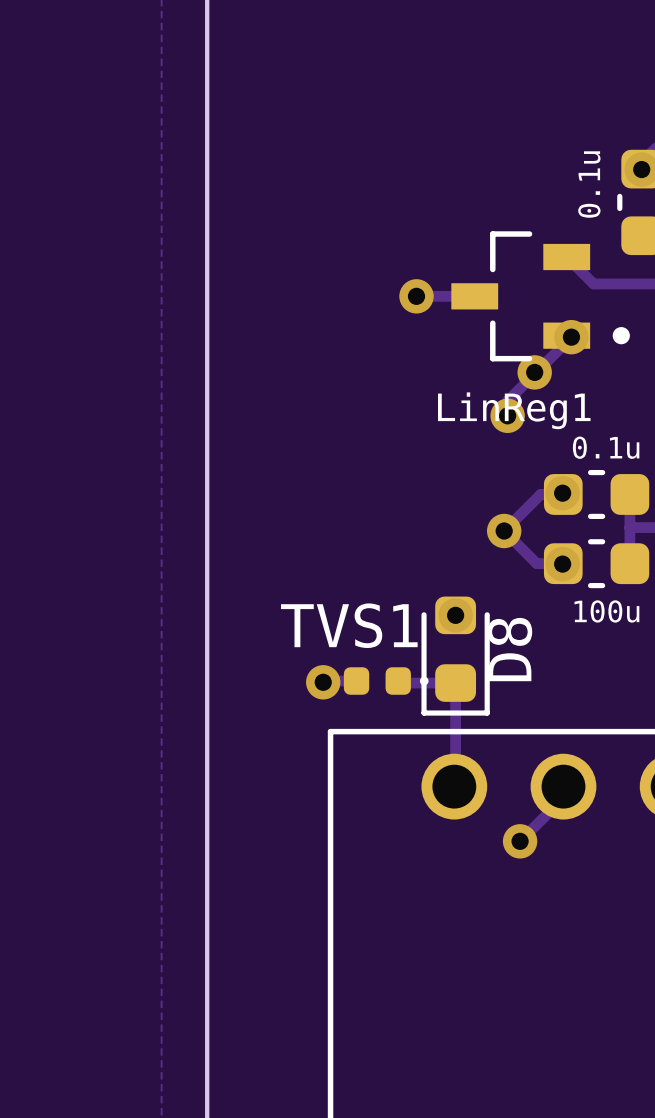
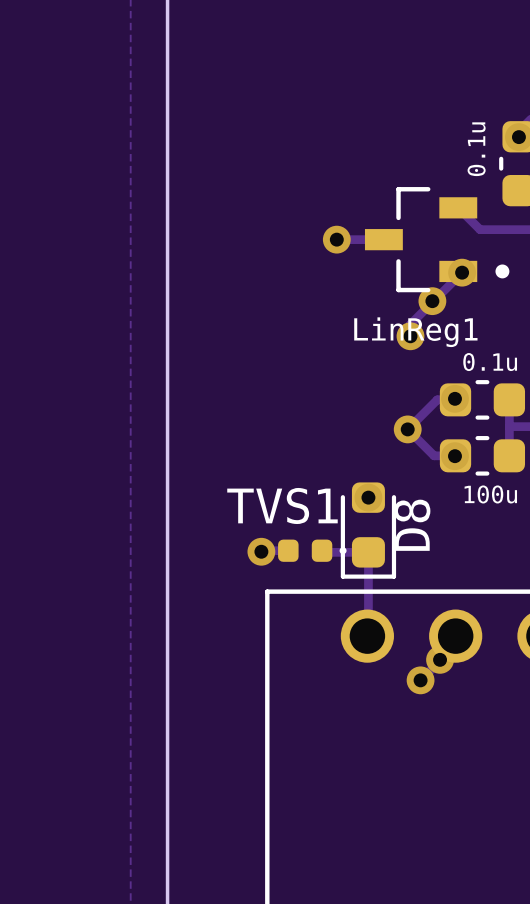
via: none -> (440, 659)

